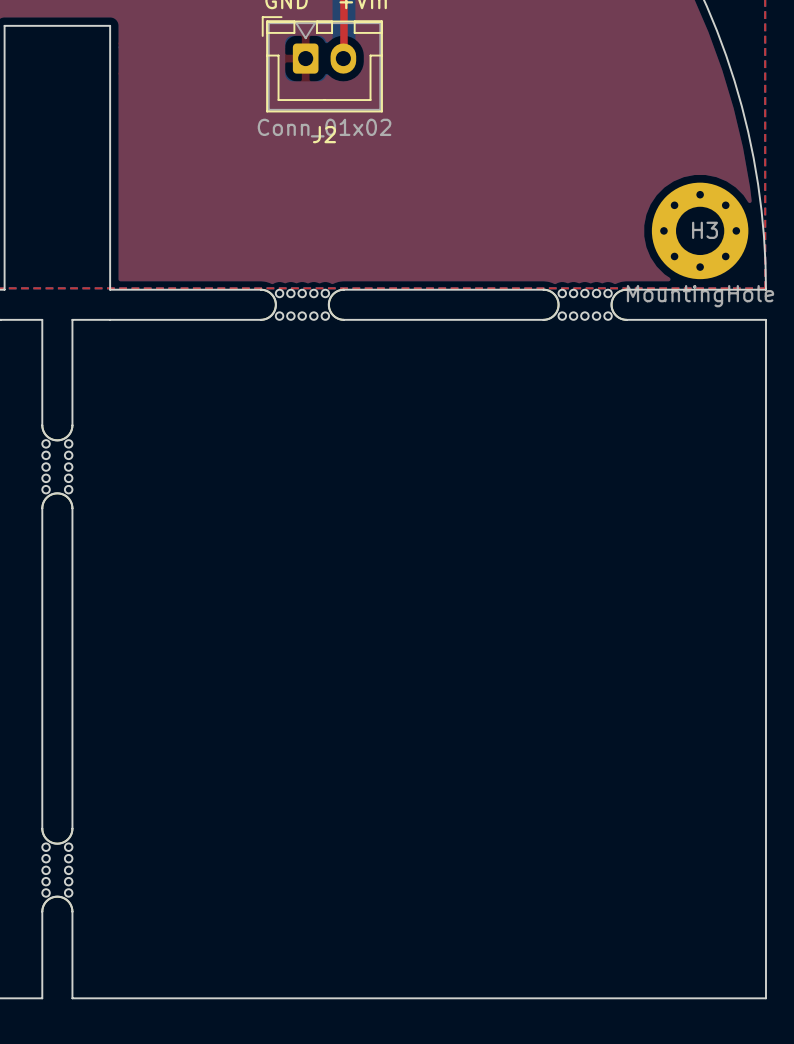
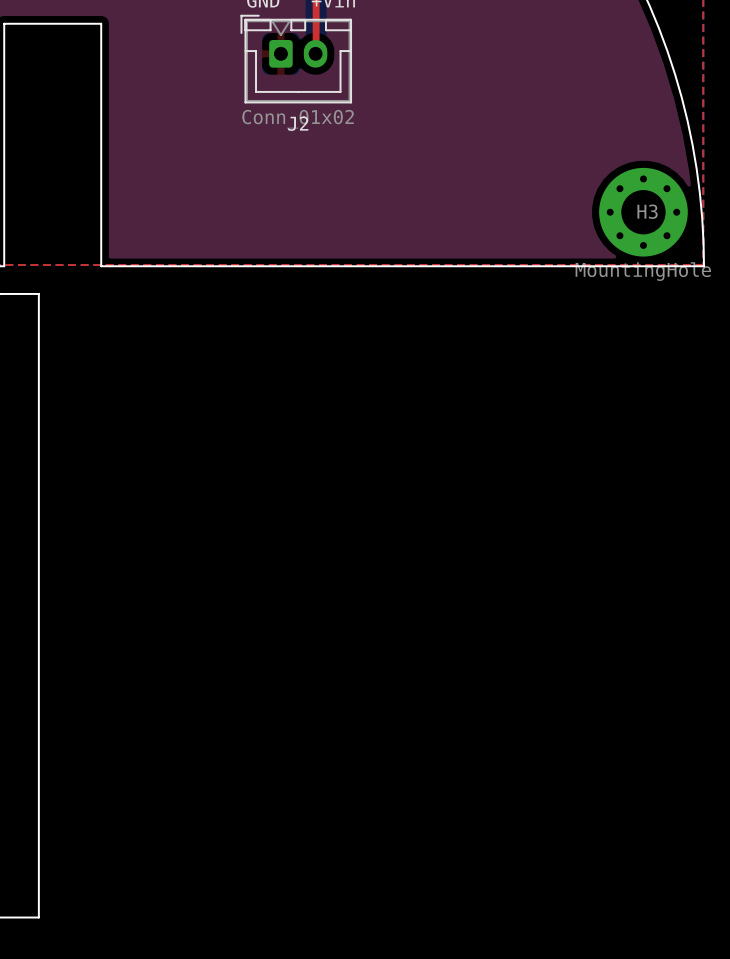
board edge: (260, 289) (271, 294) (275, 302) (272, 313) (262, 319) (72, 319) (71, 429) (66, 437) (55, 440) (45, 434) (42, 425) -> (38, 467) (38, 390)
board edge: (343, 289) (333, 294) (328, 304) (333, 315) (343, 319) (545, 319) (555, 313) (558, 302) (554, 294) (543, 289) -> (316, 266) (239, 266)
board edge: (626, 289) (615, 294) (611, 302) (614, 313) (622, 319) (765, 319) (765, 998) (72, 998) (71, 905) (64, 898) (55, 896) (45, 902) (42, 911) -> (575, 266) (499, 266)
part: (302, 304) -> none
part: (585, 304) -> none
part: (57, 466) -> none
board edge: (42, 508) (46, 497) (57, 493) (68, 497) (72, 508) (72, 830) (66, 840) (55, 843) (45, 837) (42, 828) -> (38, 837) (38, 761)
part: (57, 870) -> none

